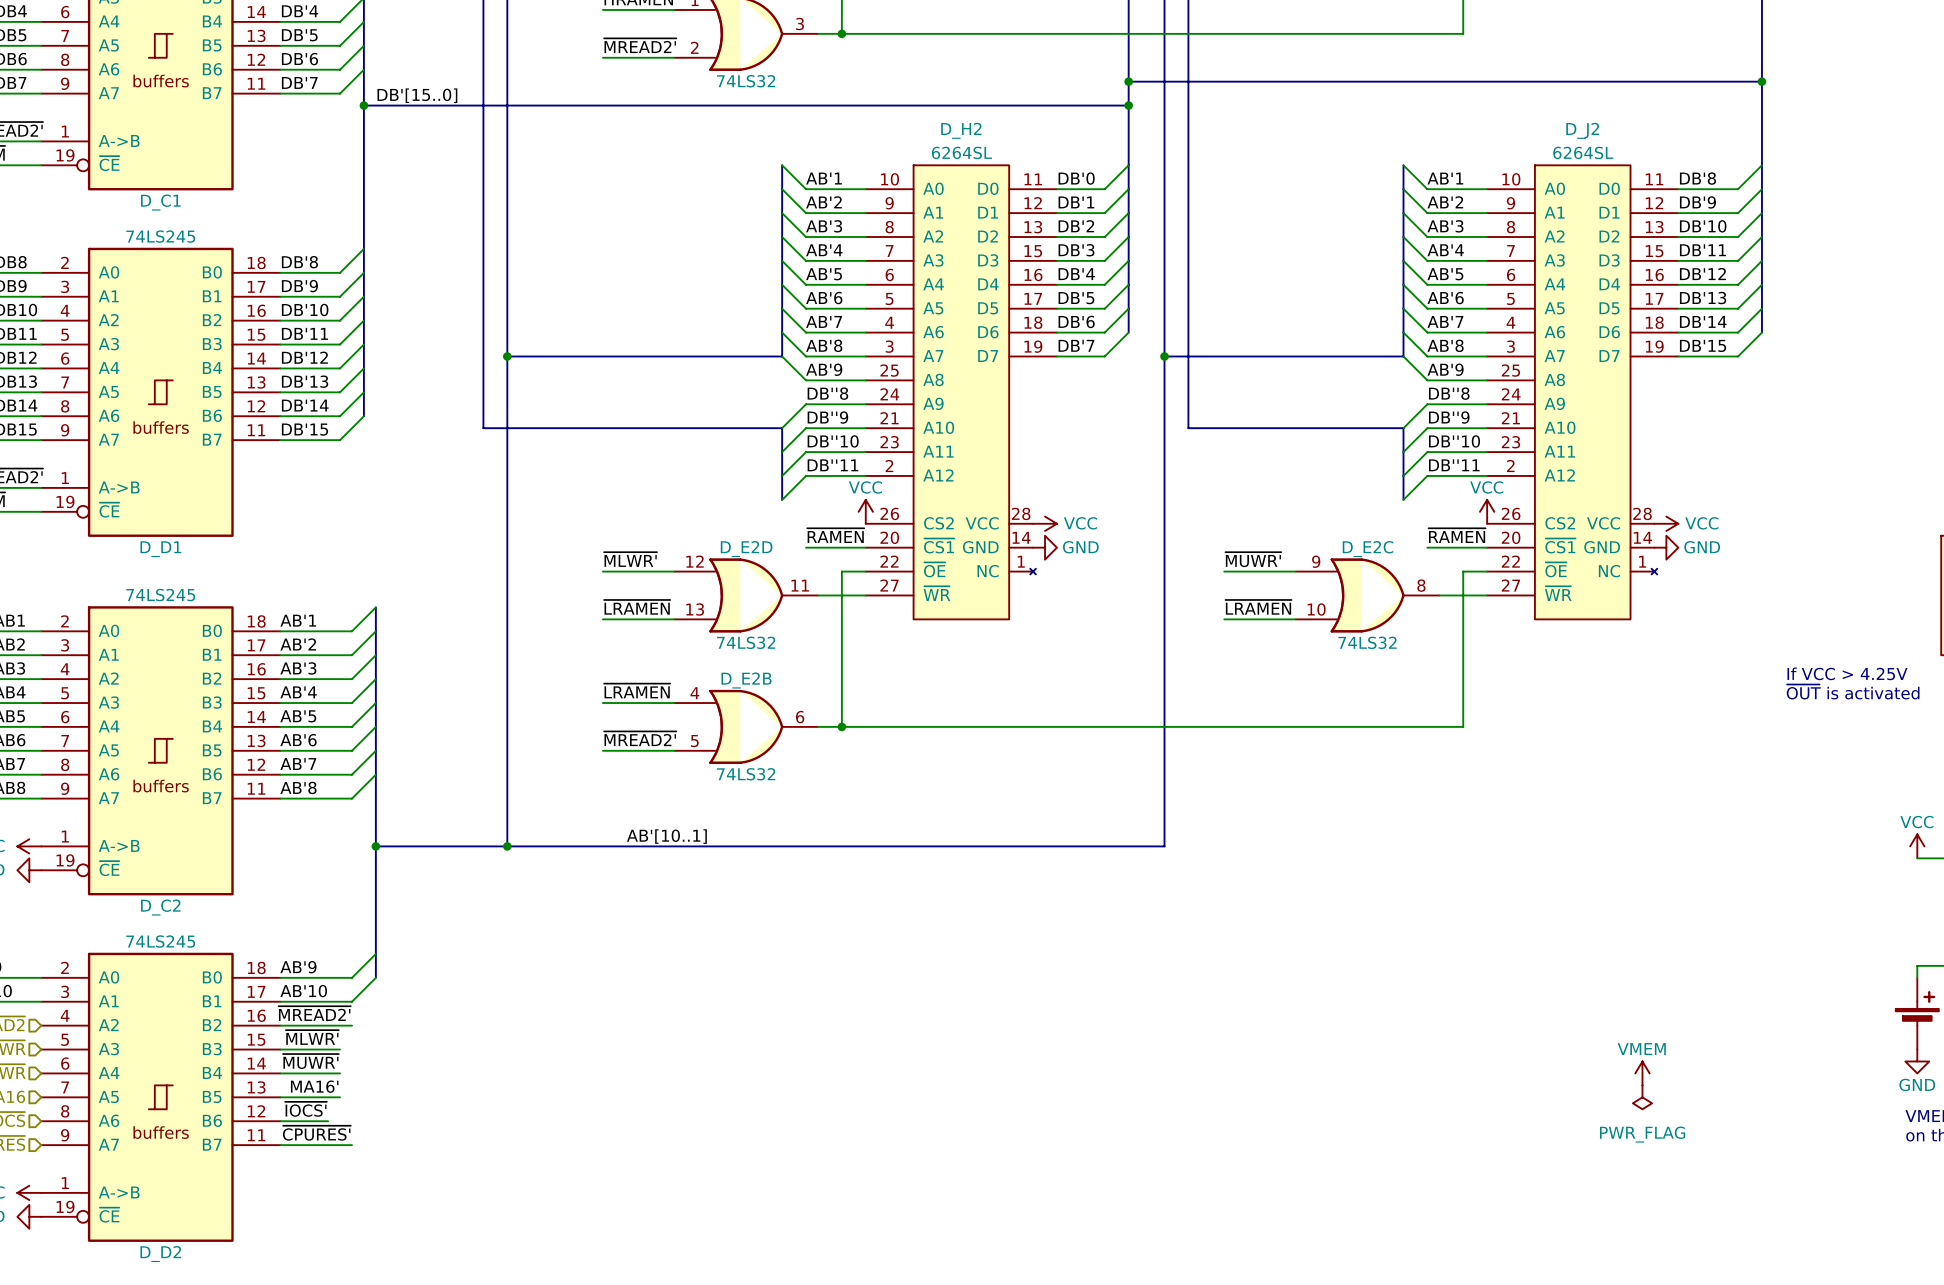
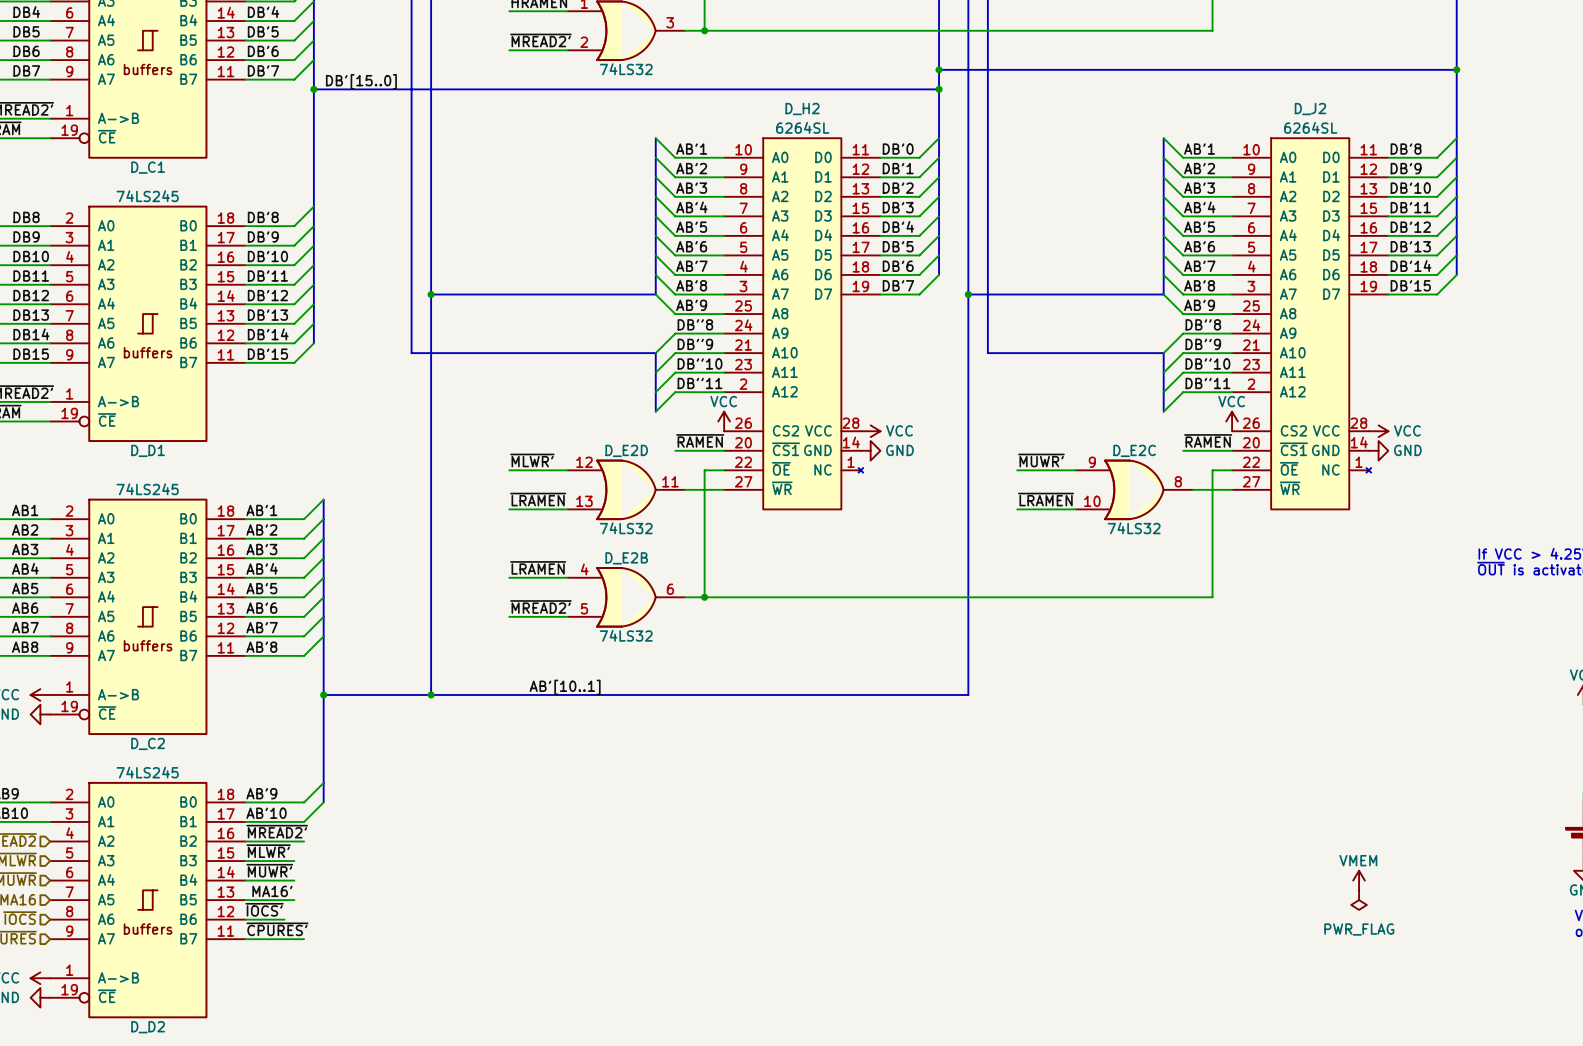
label position: ~{MREAD2'} (314, 1013) -> ~{MREAD2'} (277, 831)
label position: ~{MLWR'} (312, 1037) -> ~{MLWR'} (268, 851)
label position: ~{MUWR'} (310, 1061) -> ~{MUWR'} (269, 870)
label position: ~{CPURES'} (316, 1133) -> ~{CPURES'} (277, 929)

